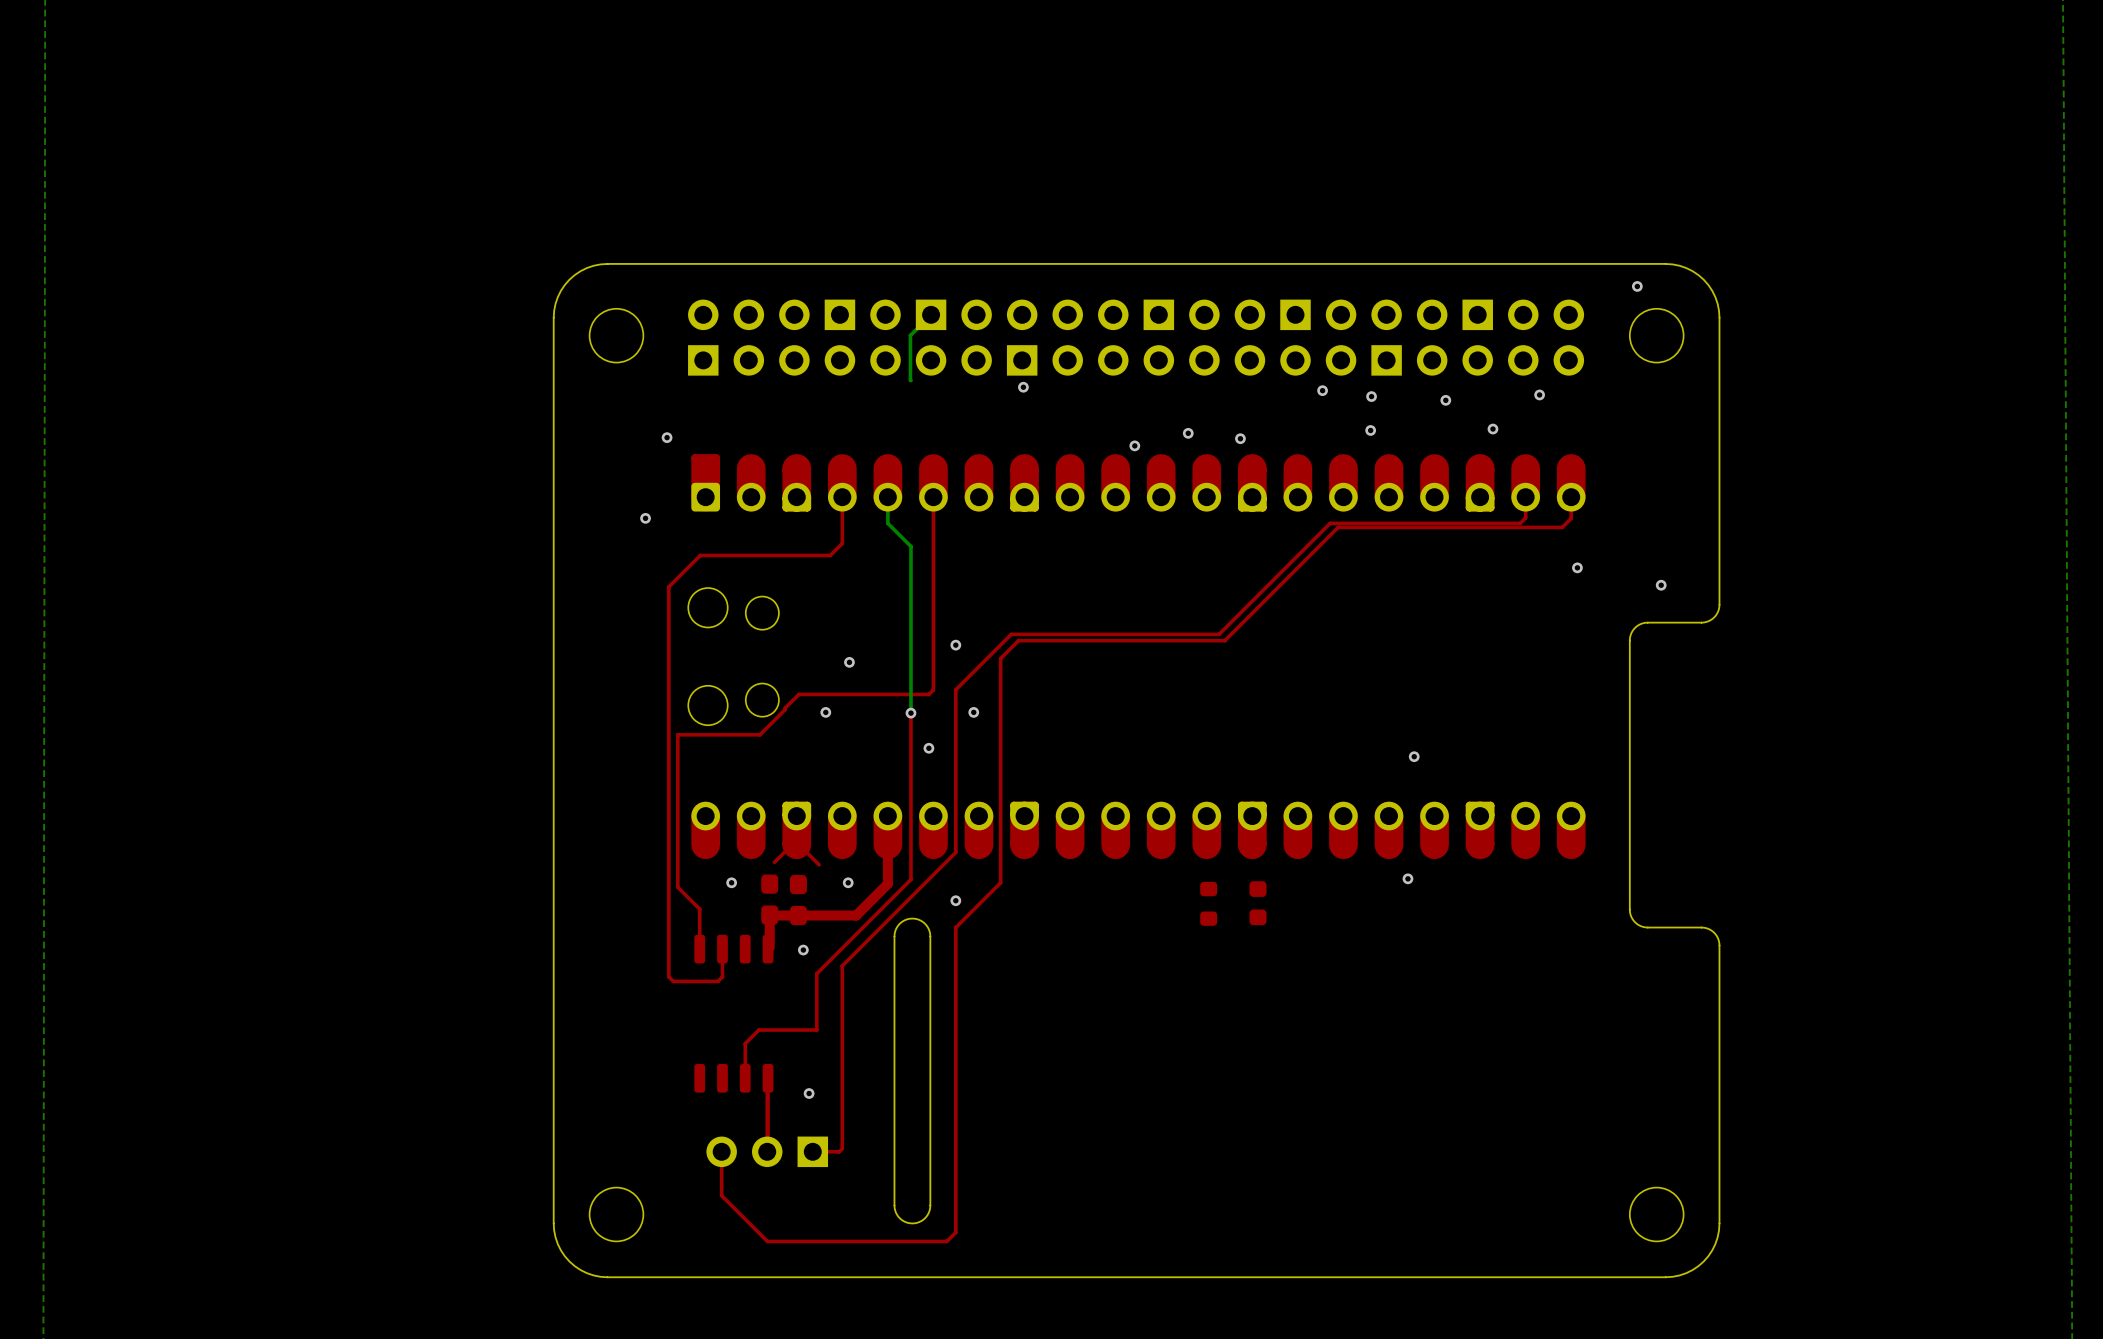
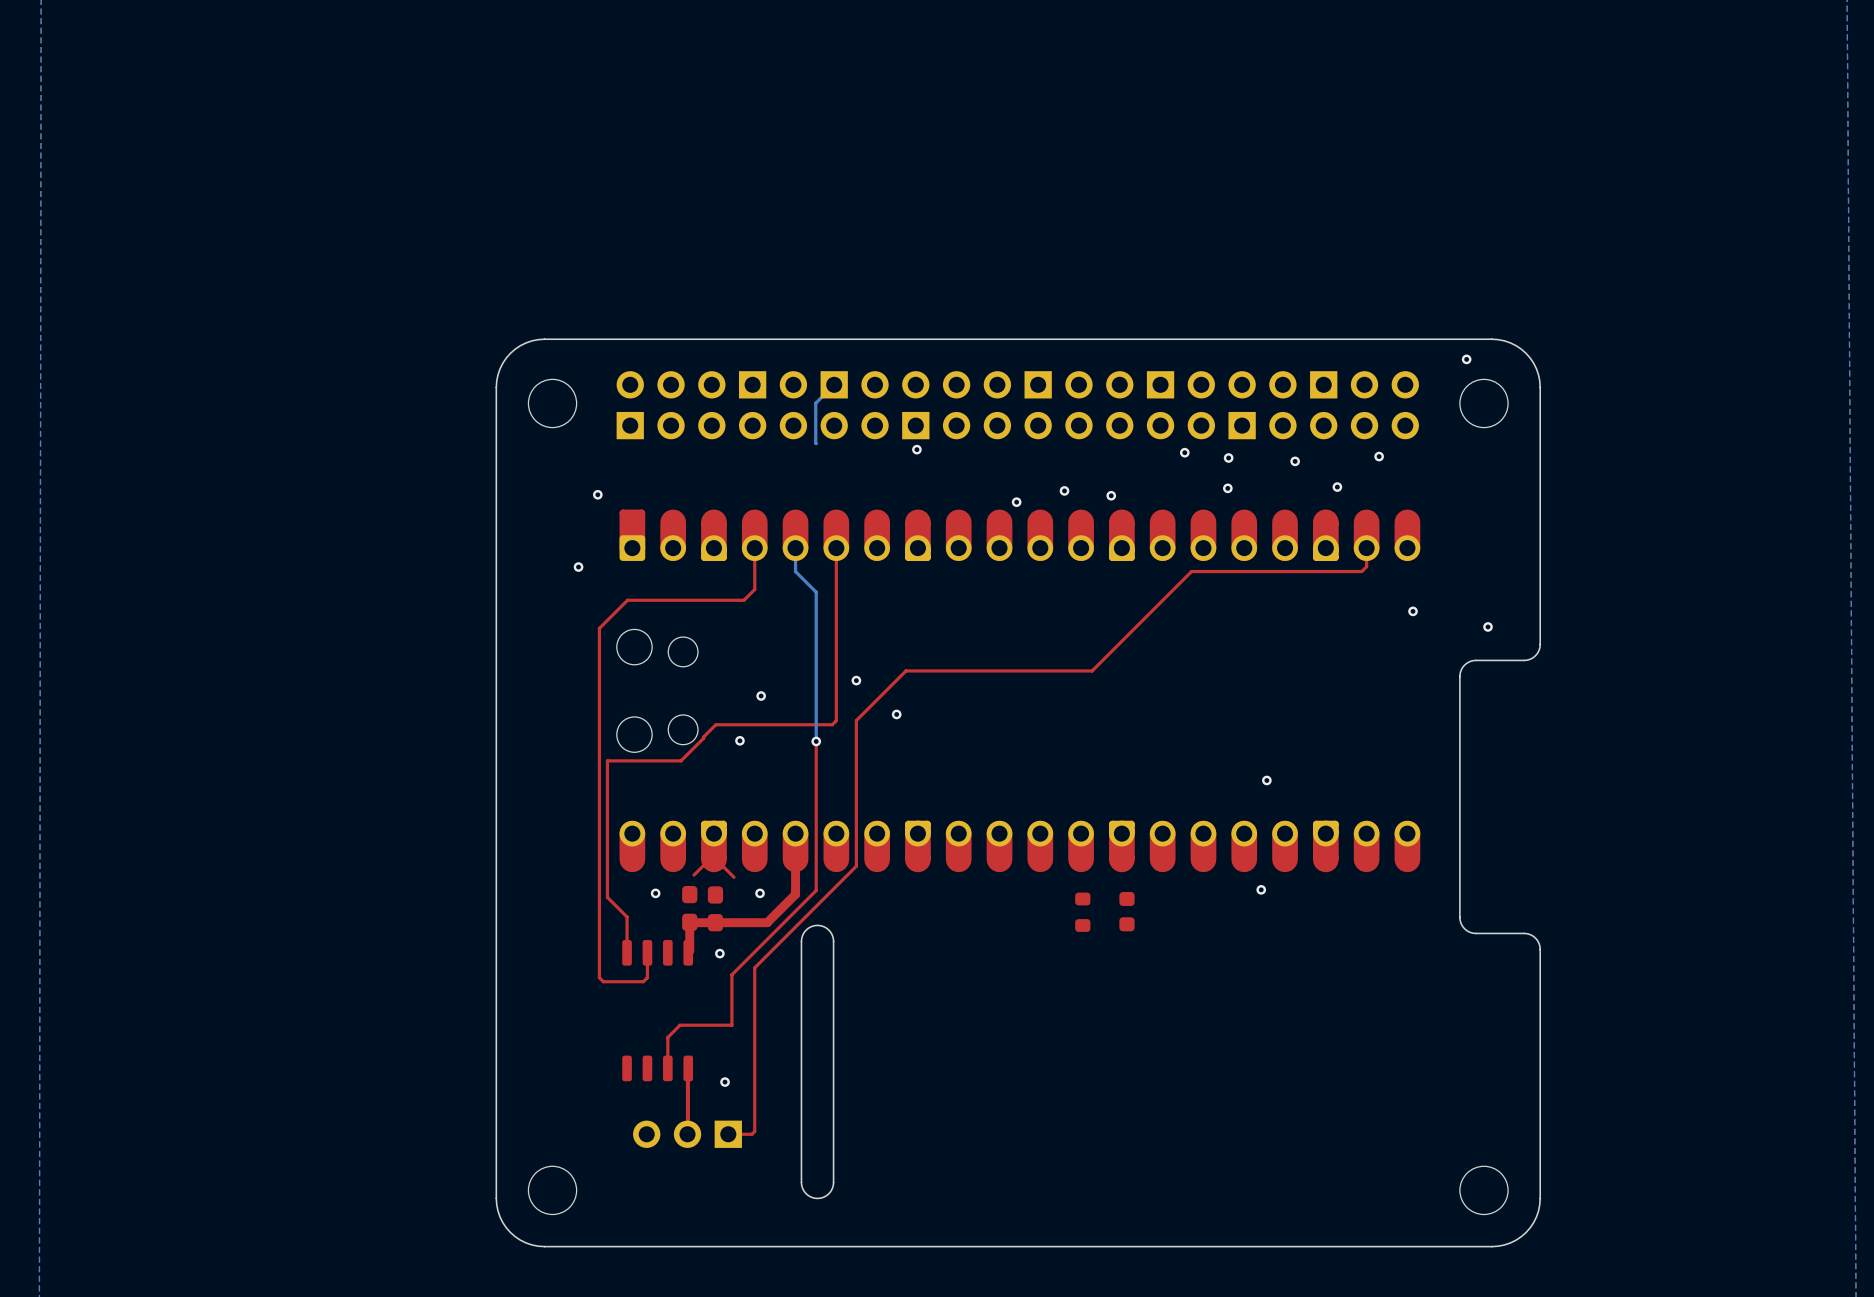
top track: (1571, 497) (1571, 518) (1562, 527) (1338, 527) (1224, 640) (1018, 640) (1000, 658) (1000, 882) (955, 927) (955, 1232) (946, 1241) (767, 1241) (721, 1195) (721, 1151) -> none
via position: (973, 712) -> (896, 714)
via: (928, 748) -> none
via: (955, 900) -> none

